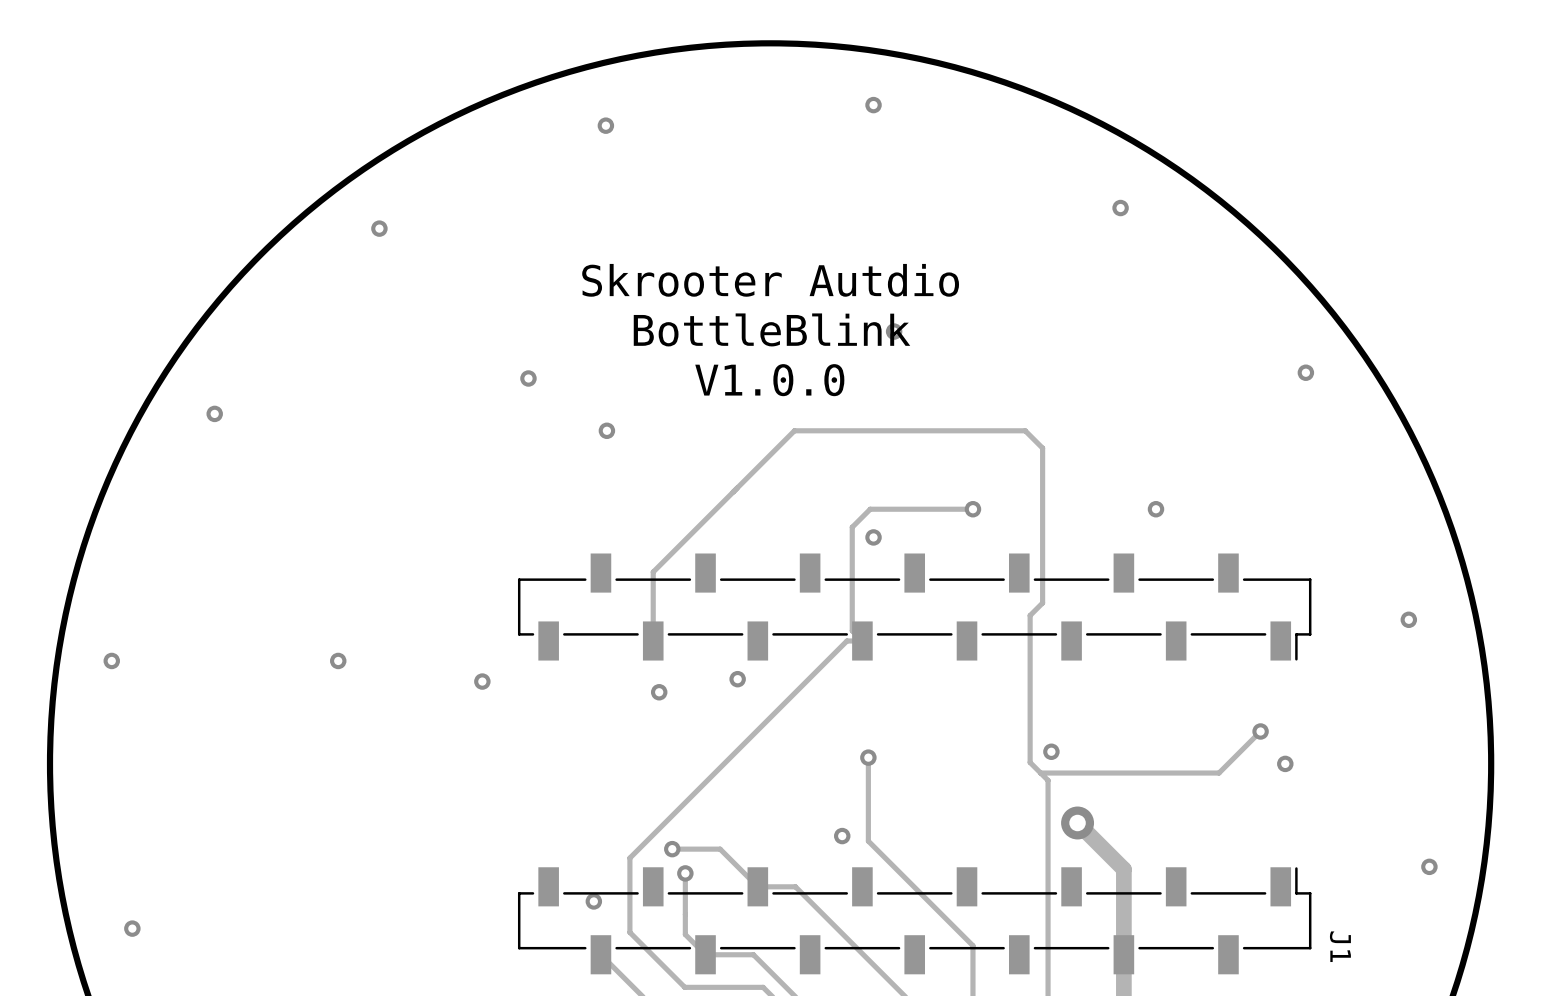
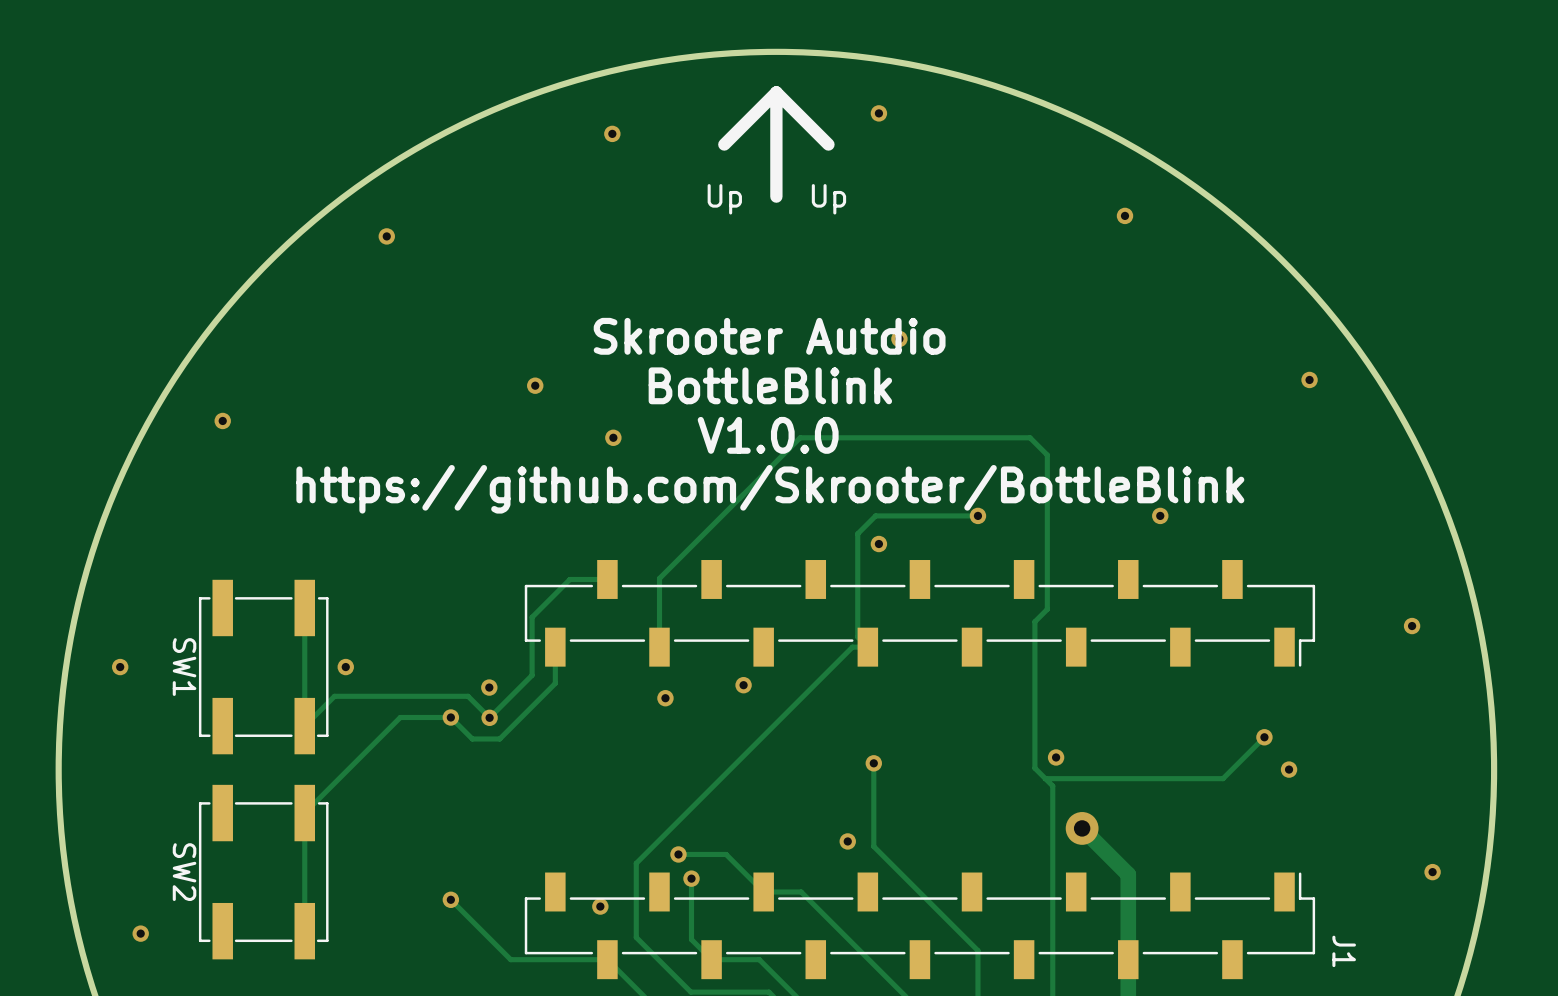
line: none -> (776, 92) (724, 144)
line: none -> (776, 92) (776, 196)
line: none -> (776, 92) (828, 144)
text: none -> Up (724, 199)
text: none -> Up (828, 199)
text position: Skrooter Autdio (770, 280) -> Skrooter Autdio (769, 336)
text position: BottleBlink (771, 329) -> BottleBlink (770, 385)
text position: V1.0.0 (769, 380) -> V1.0.0 (768, 435)
text: none -> https://github.com/Skrooter/BottleBlink (770, 489)
track: none -> (607, 579) (569, 579) (532, 617) (532, 675) (489, 717) (468, 696) (334, 696) (304, 726) (304, 607)
track: none -> (555, 647) (555, 683) (499, 738) (472, 738) (450, 717) (400, 717) (304, 813) (304, 931)
SW1: none -> (263, 667)
via: none -> (450, 717)
via: none -> (489, 717)
SW2: none -> (263, 872)
track: none -> (450, 899) (510, 959) (607, 959)
via: none -> (450, 899)

